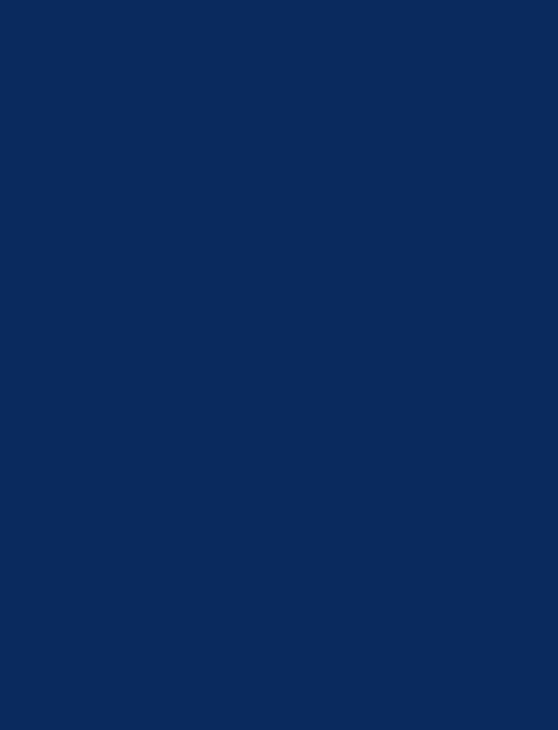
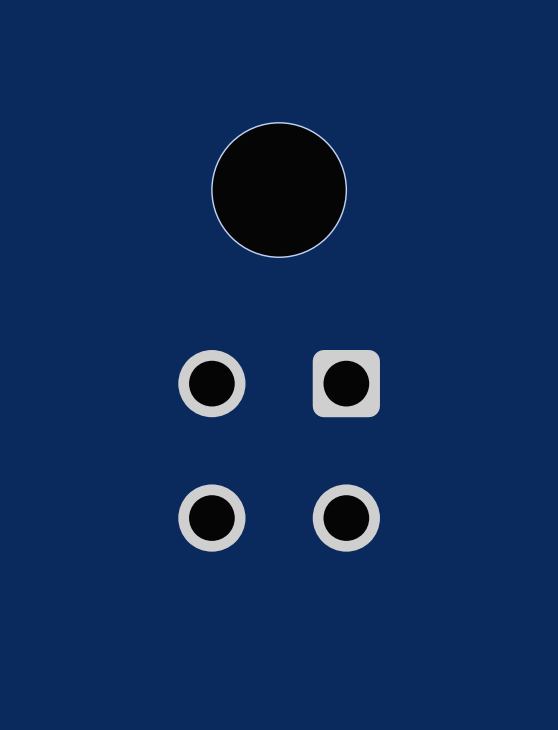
part: none -> (279, 337)

